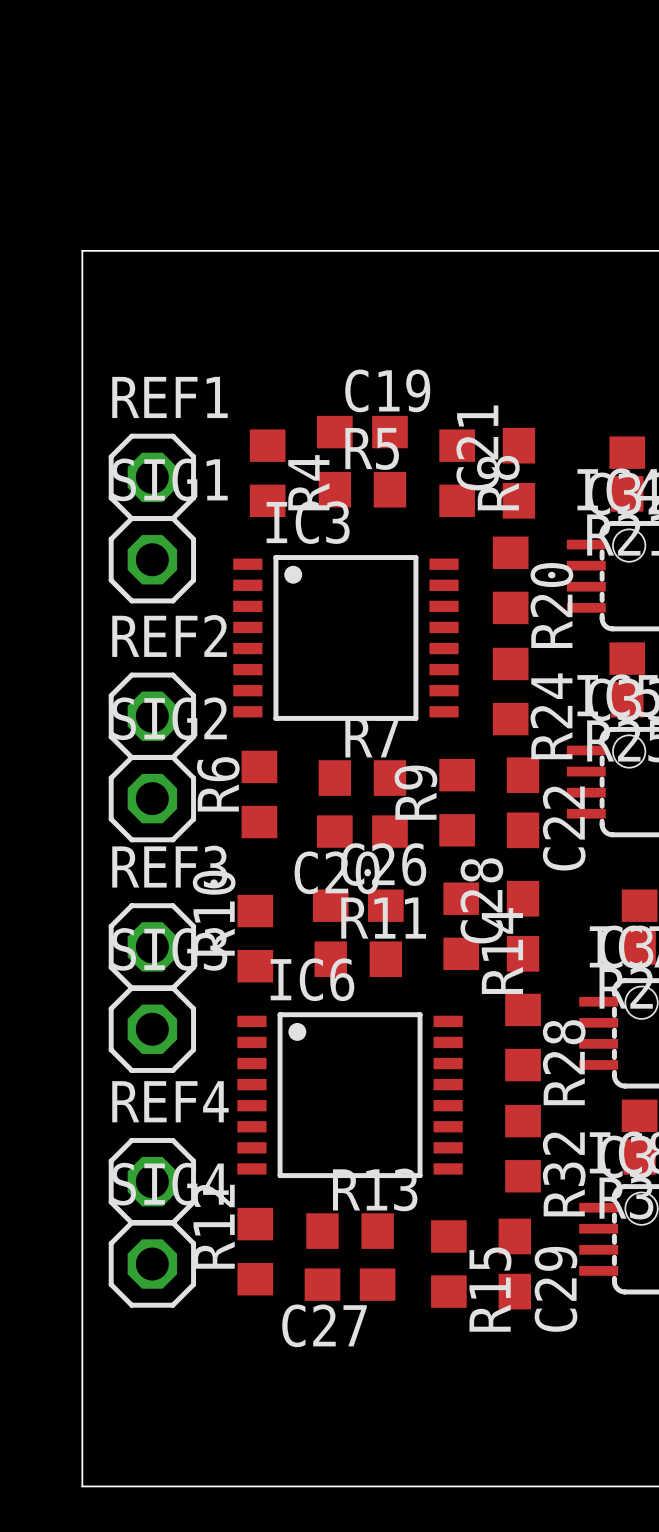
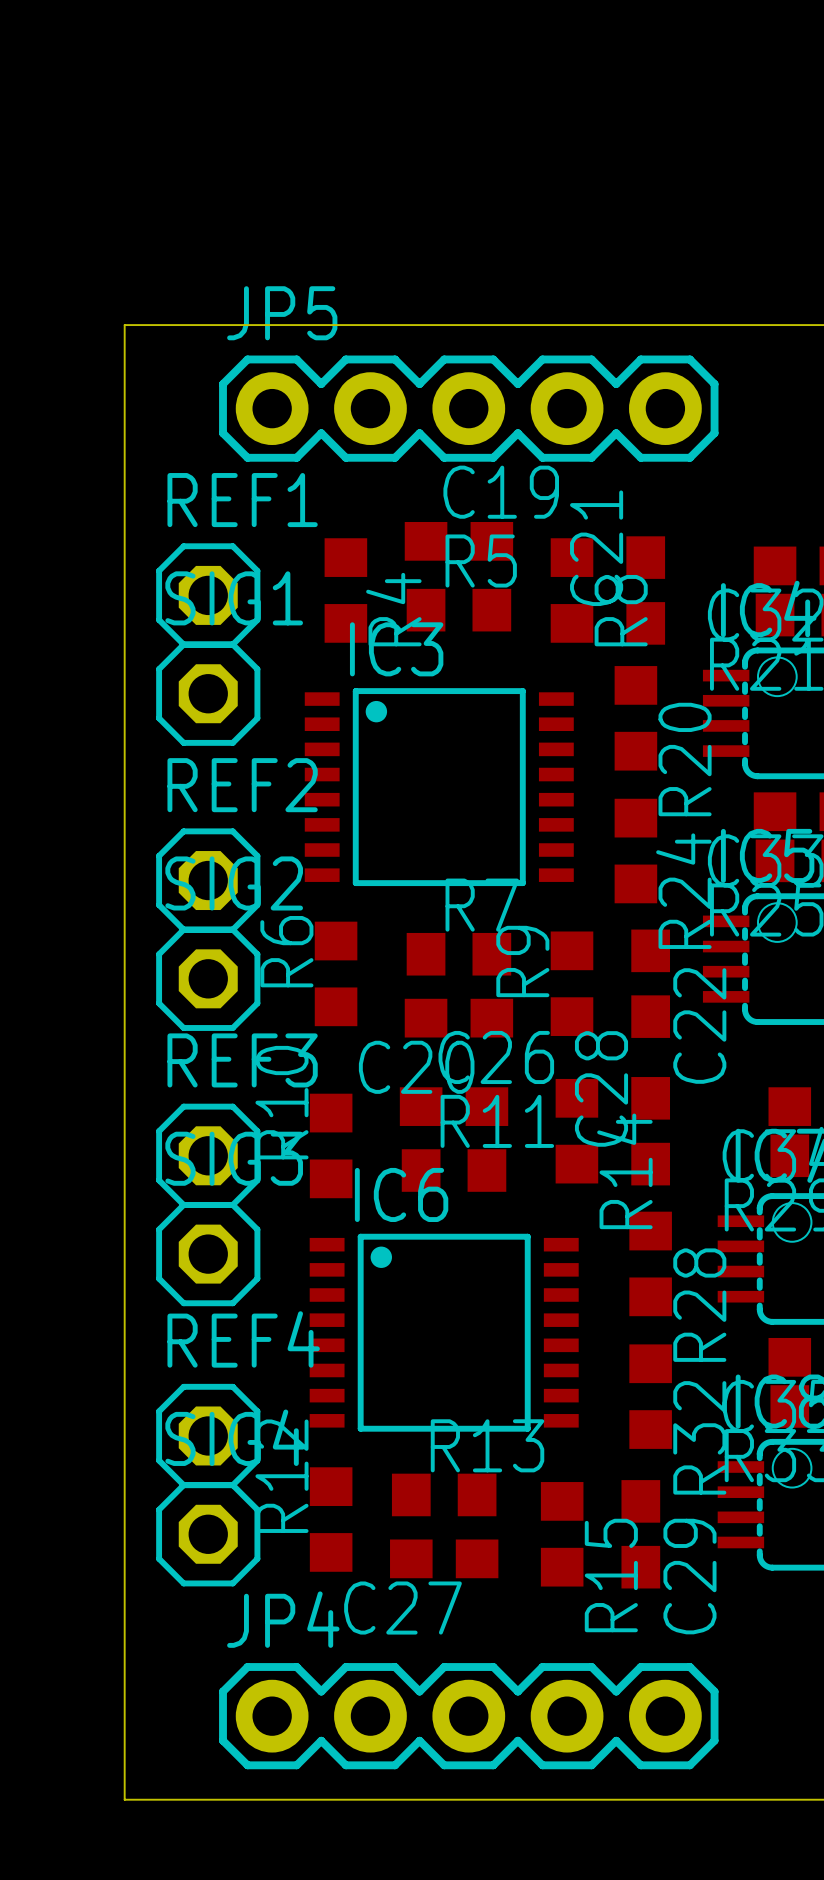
JP5: none -> (468, 408)
JP4: none -> (468, 1716)

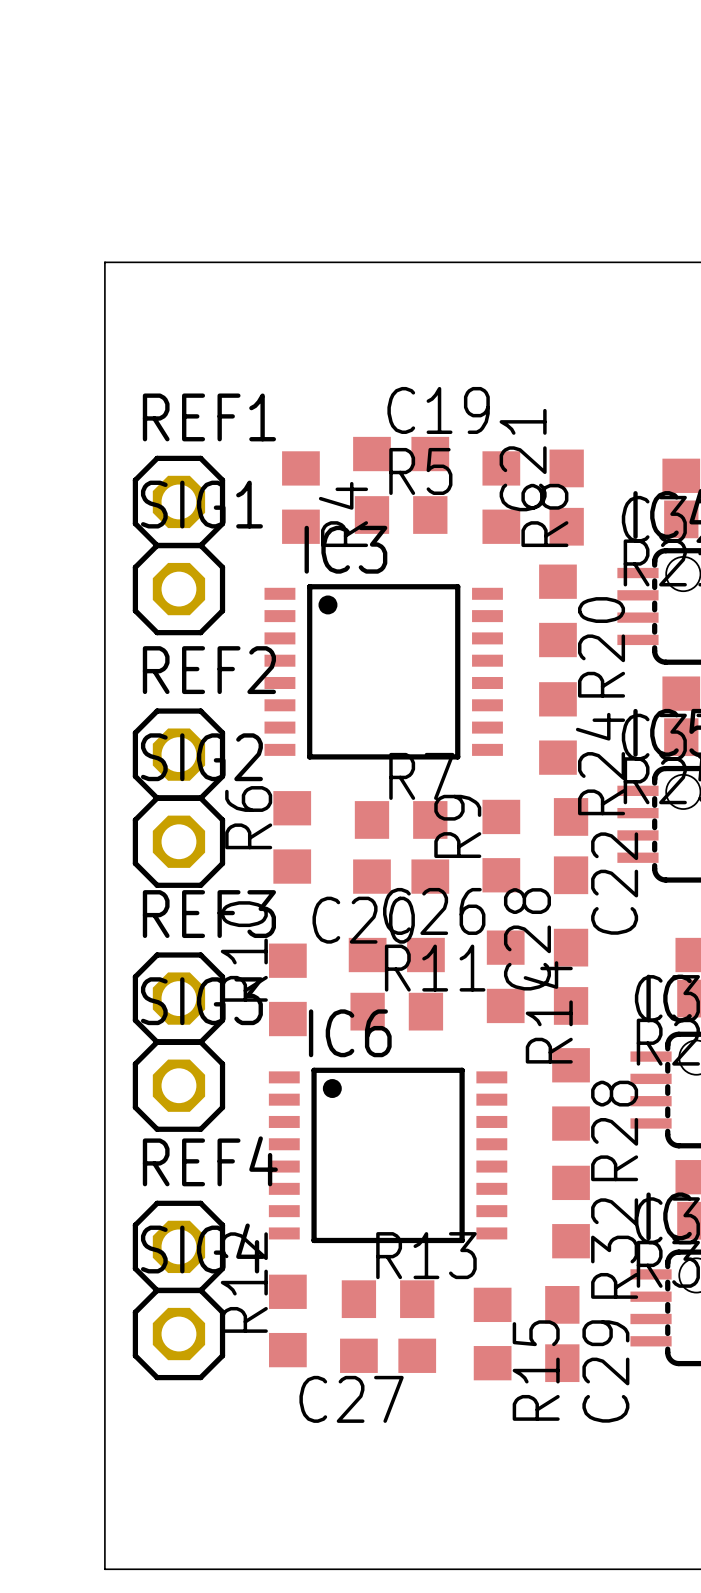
JP5: (468, 408) -> none
JP4: (468, 1716) -> none

